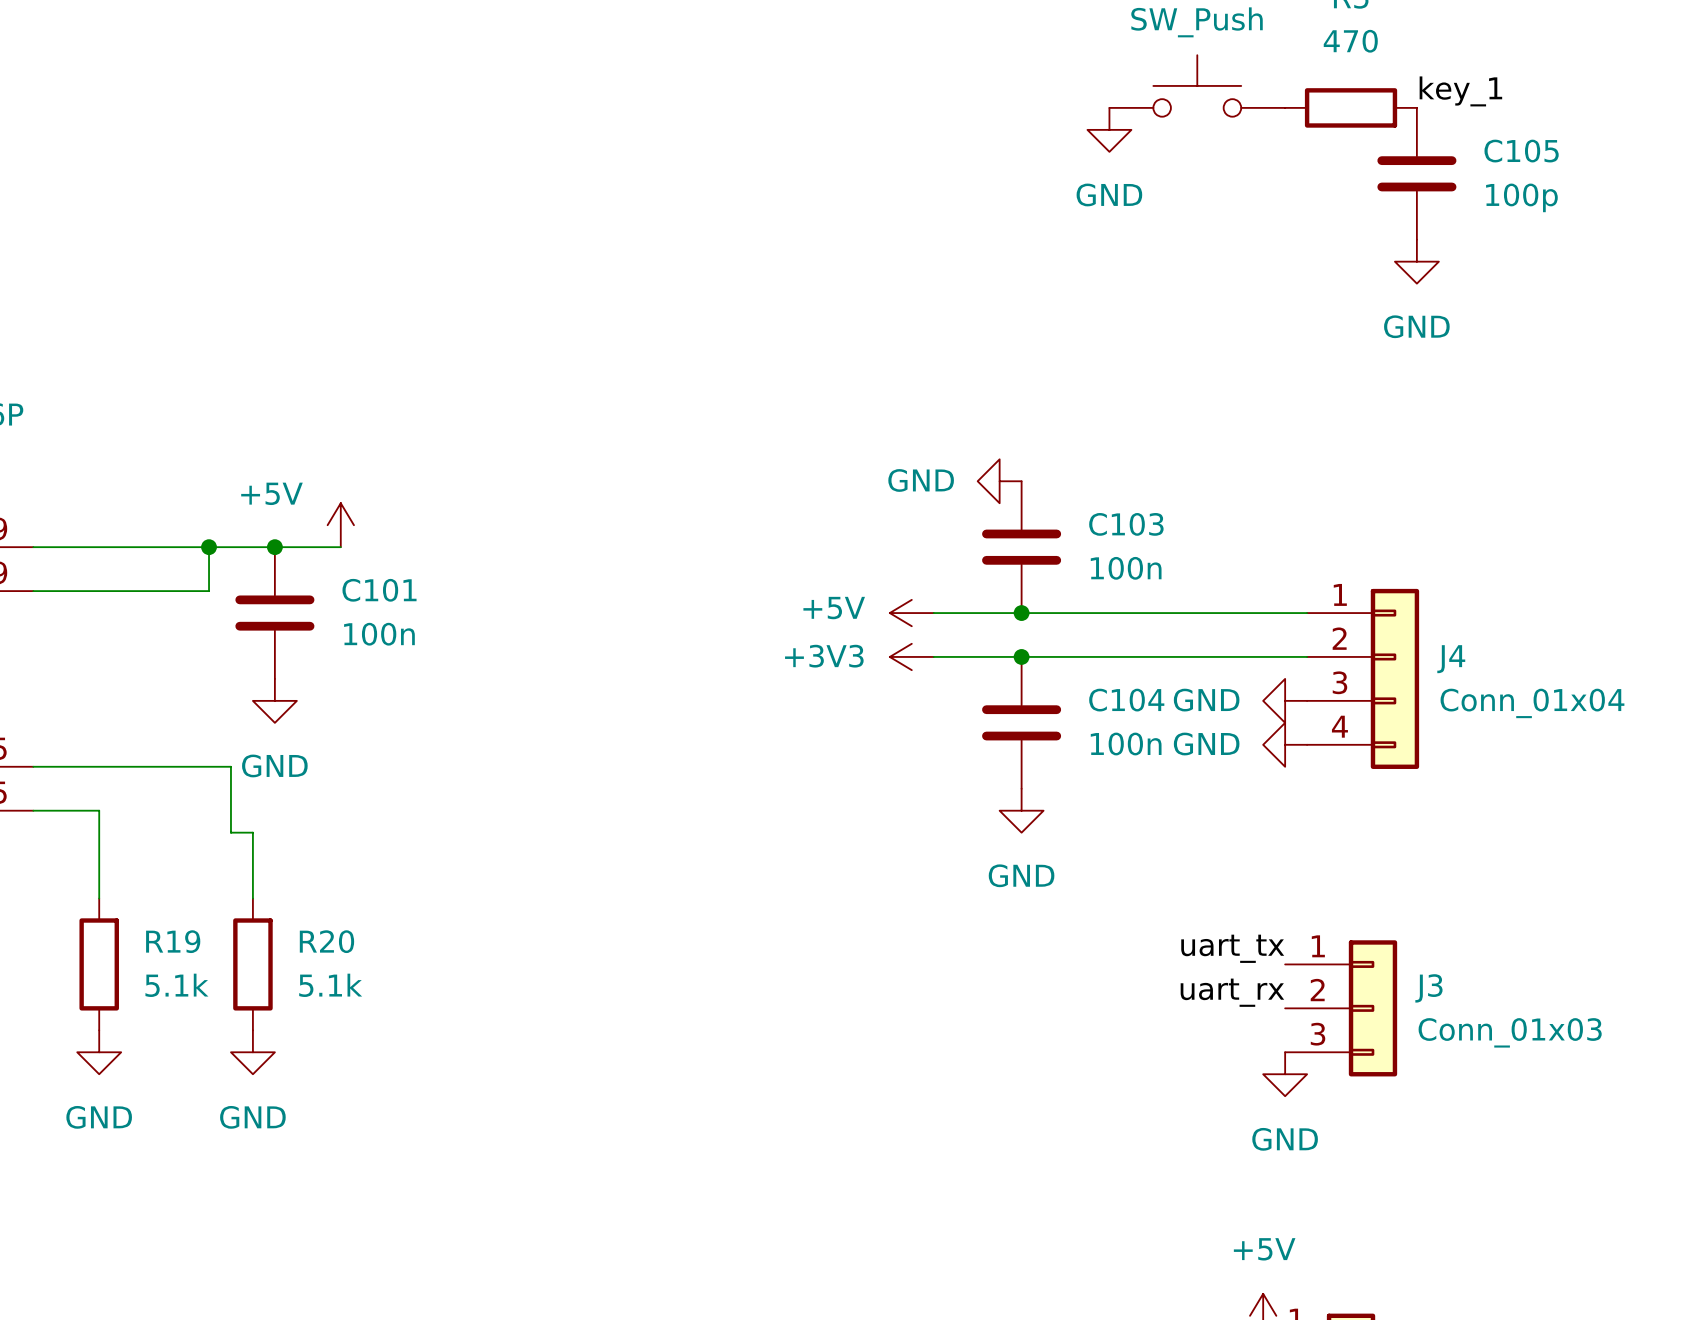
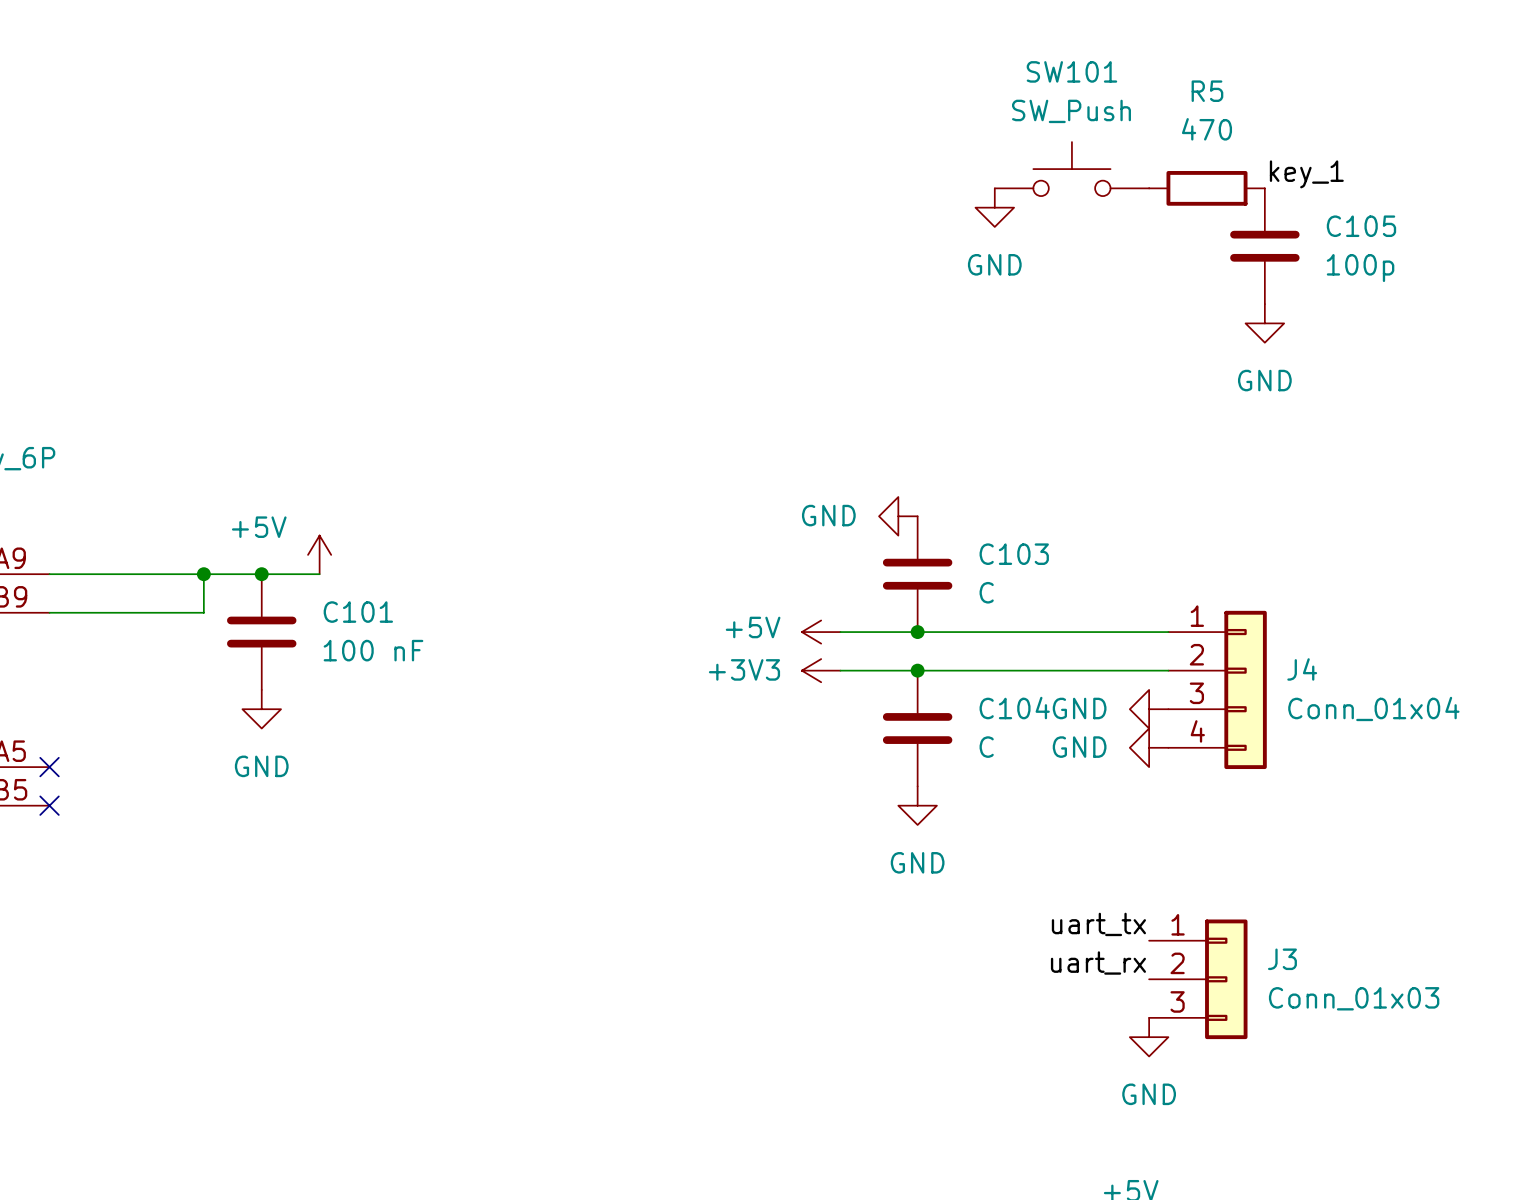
C103 value: 100n (1126, 568) -> C (986, 592)
C101 value: 100n (379, 634) -> 100 nF (373, 650)
C104 value: 100n (1126, 744) -> C (986, 747)
wire: (33, 766) (230, 766) (230, 832) (252, 832) (252, 898) -> none
no-connect mark: none -> (49, 767)
wire: (33, 810) (99, 810) (99, 898) -> none
no-connect mark: none -> (49, 805)
R19: 5.1k (99, 964) -> none
R20: 5.1k (252, 964) -> none
power symbol: GND (99, 1052) -> none
power symbol: GND (252, 1052) -> none

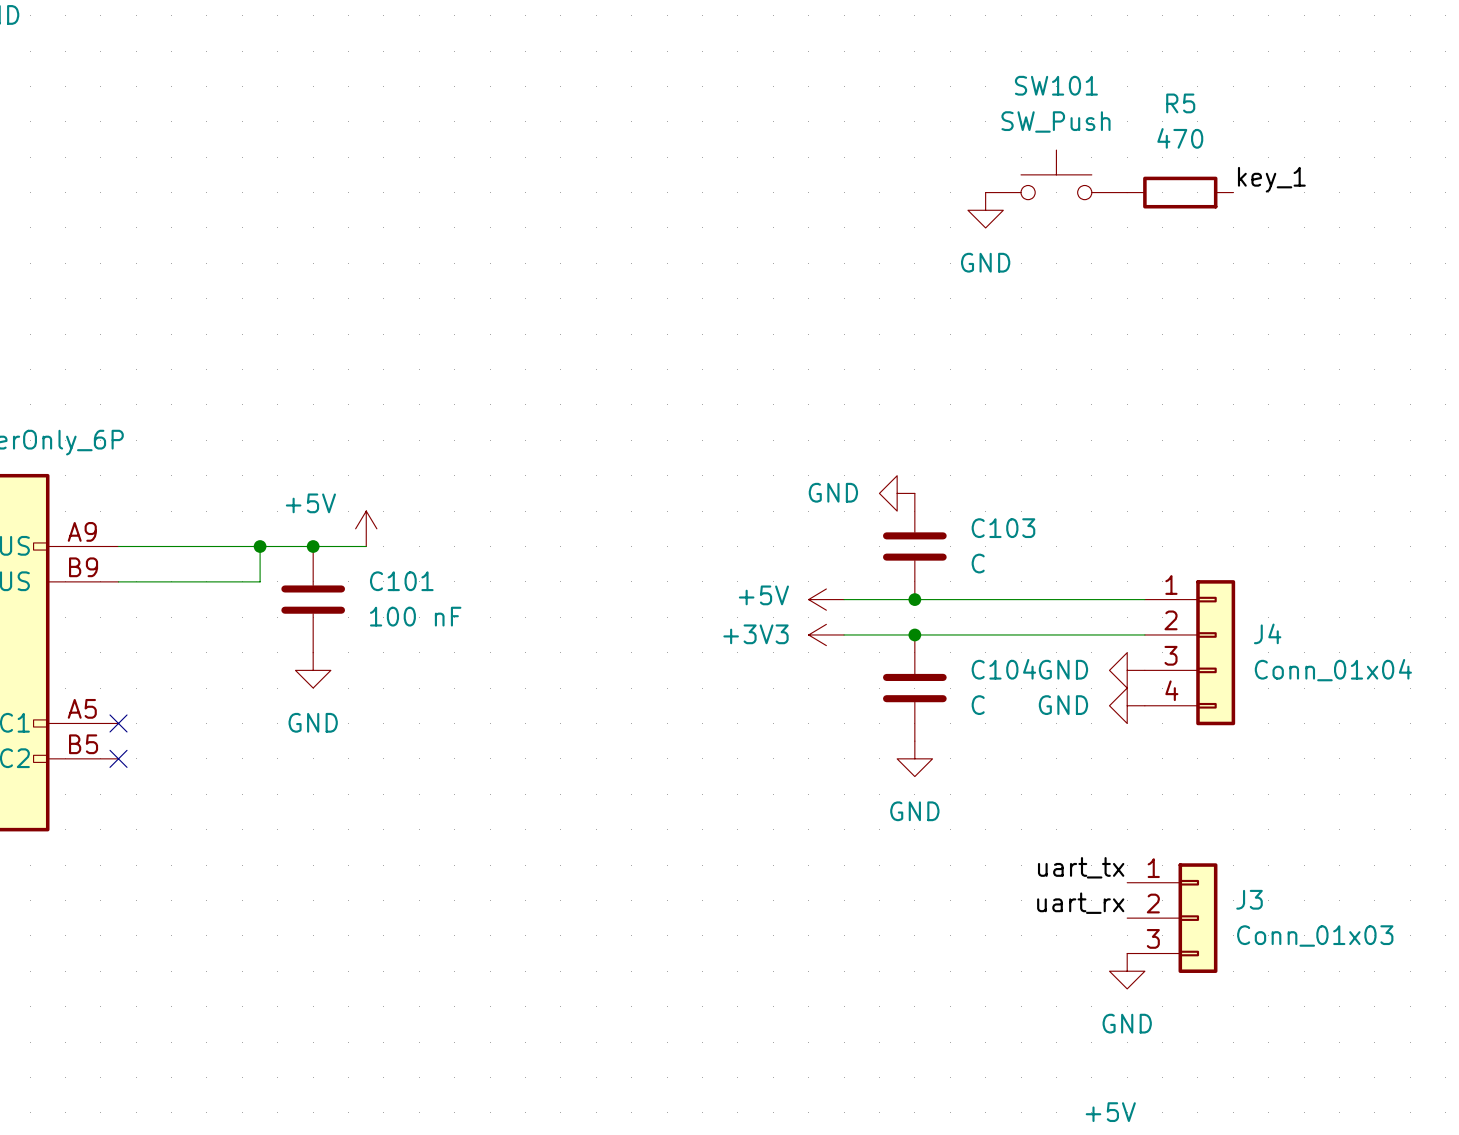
C105: 100p (1264, 246) -> none
power symbol: GND (1264, 323) -> none

